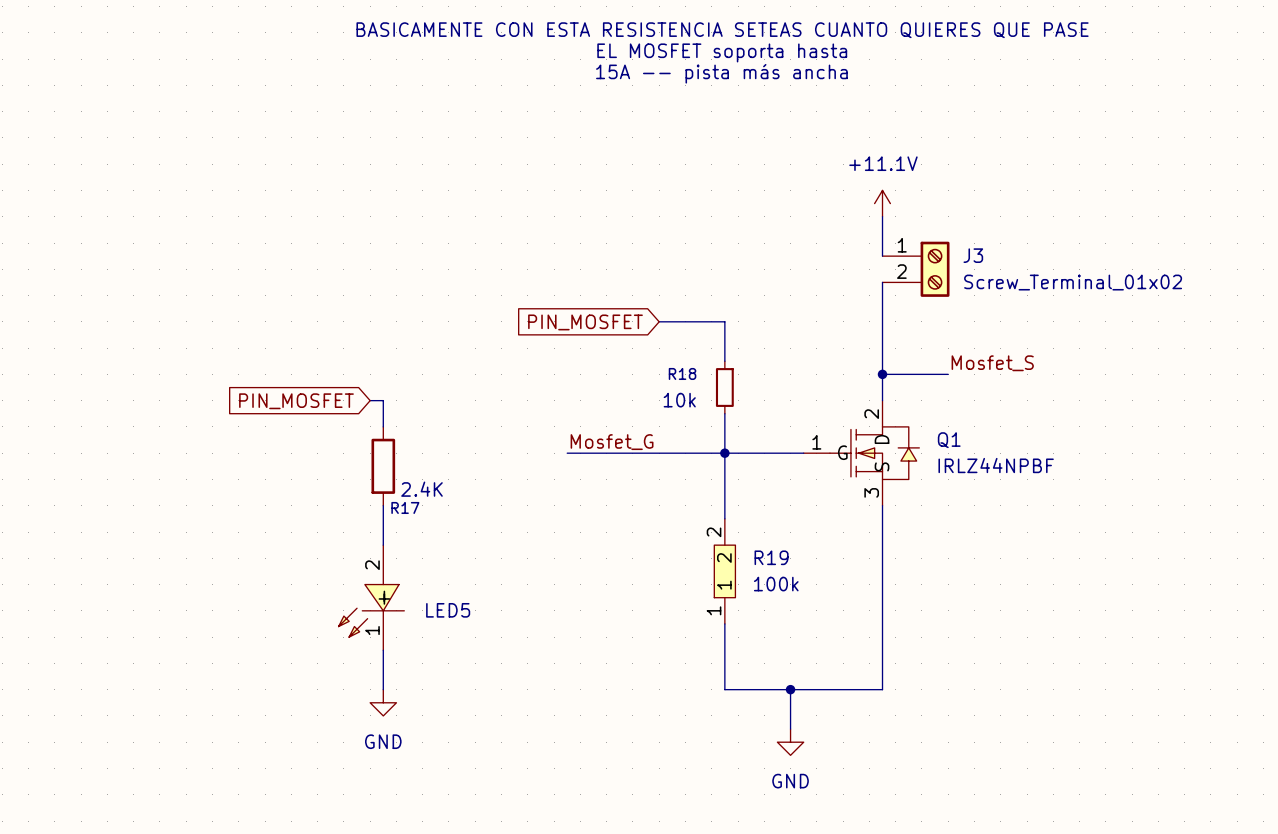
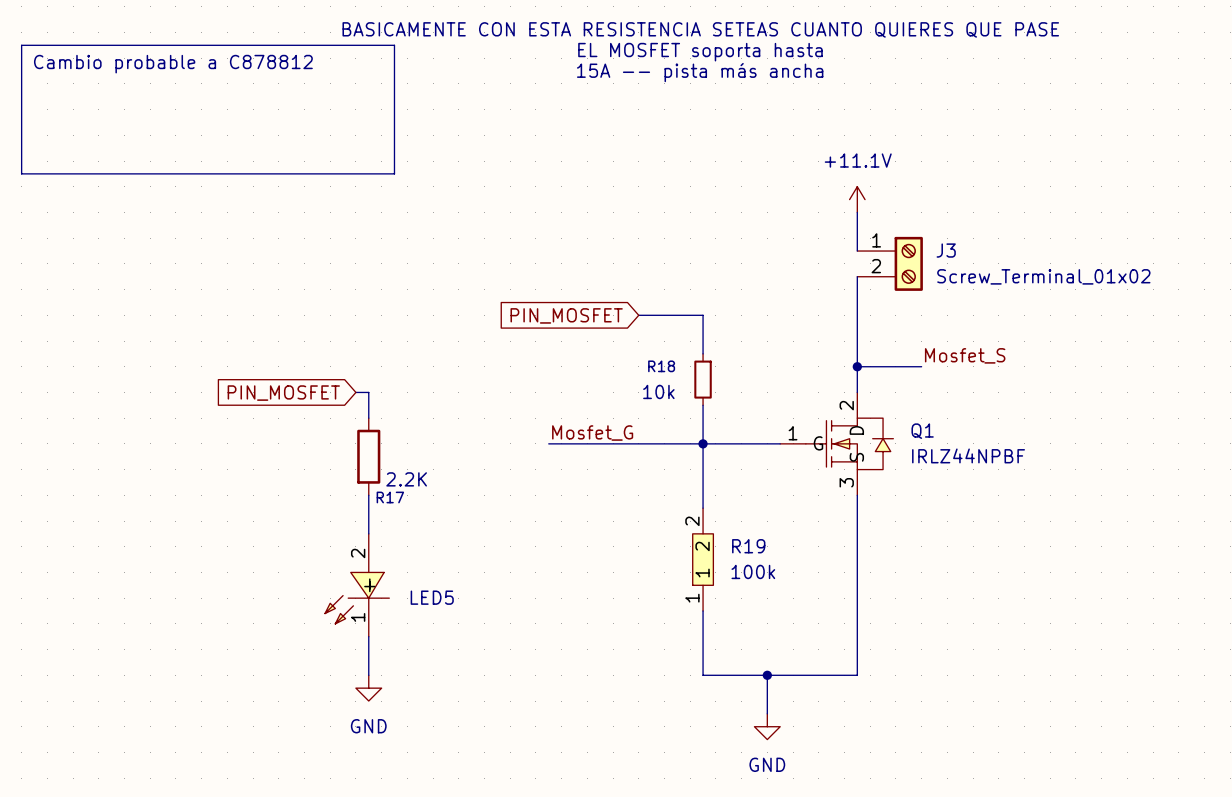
line: none -> (21, 45) (394, 45) (394, 173) (21, 173) (21, 45)
text: none -> Cambio probable a C878812 (173, 64)
R17 value: 2.4K (422, 489) -> 2.2K (406, 479)

